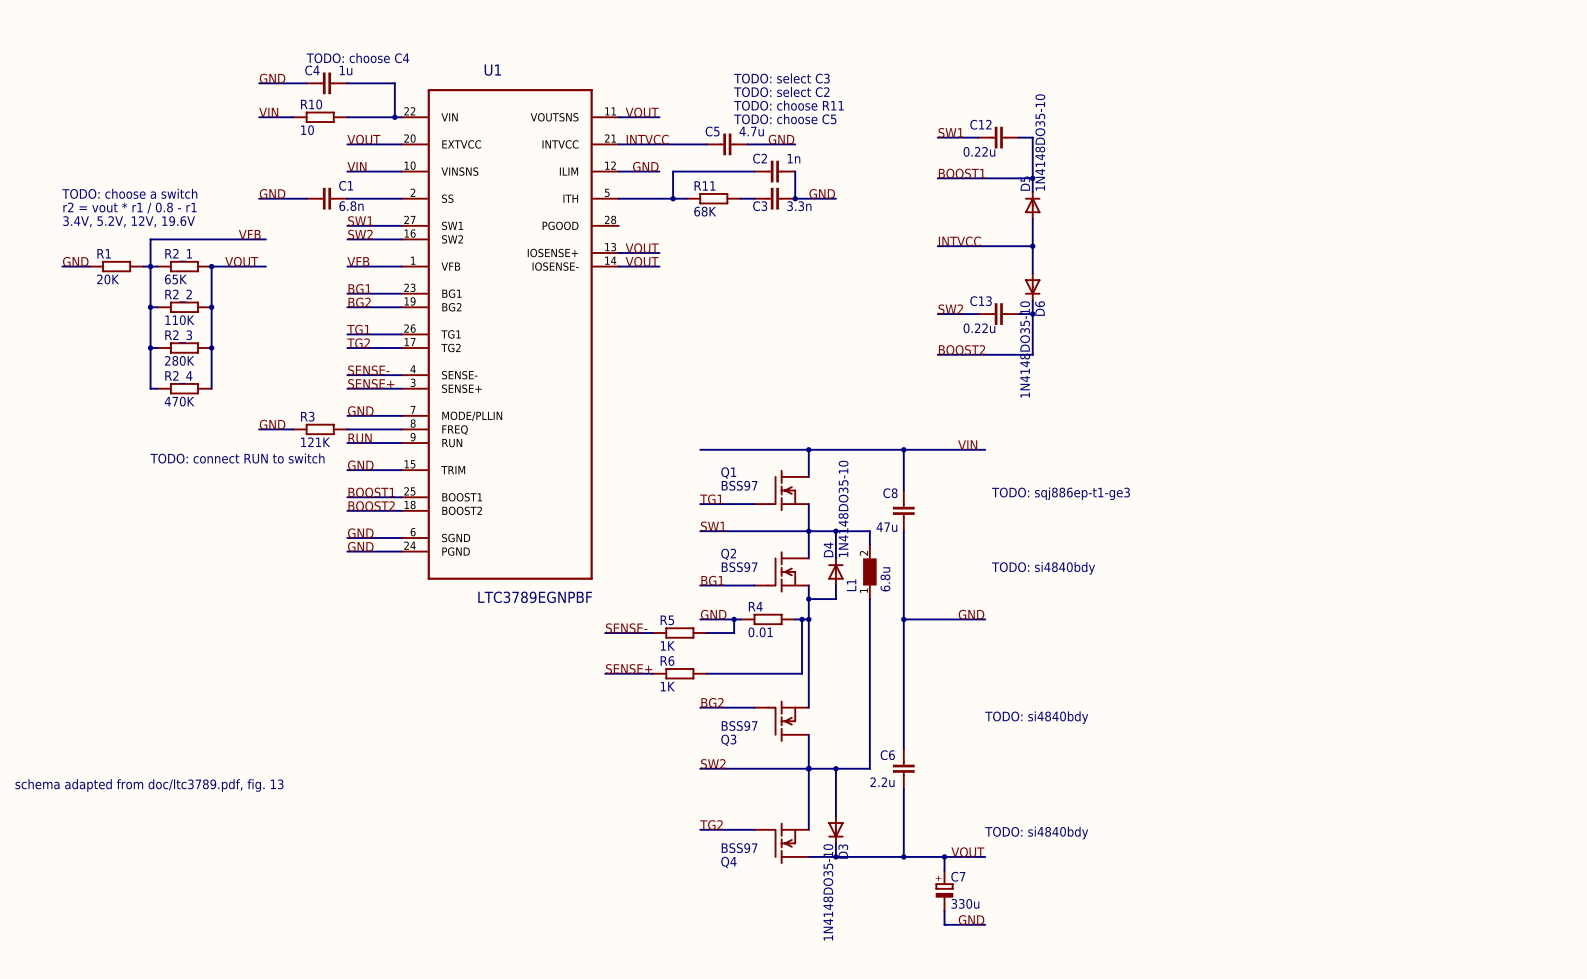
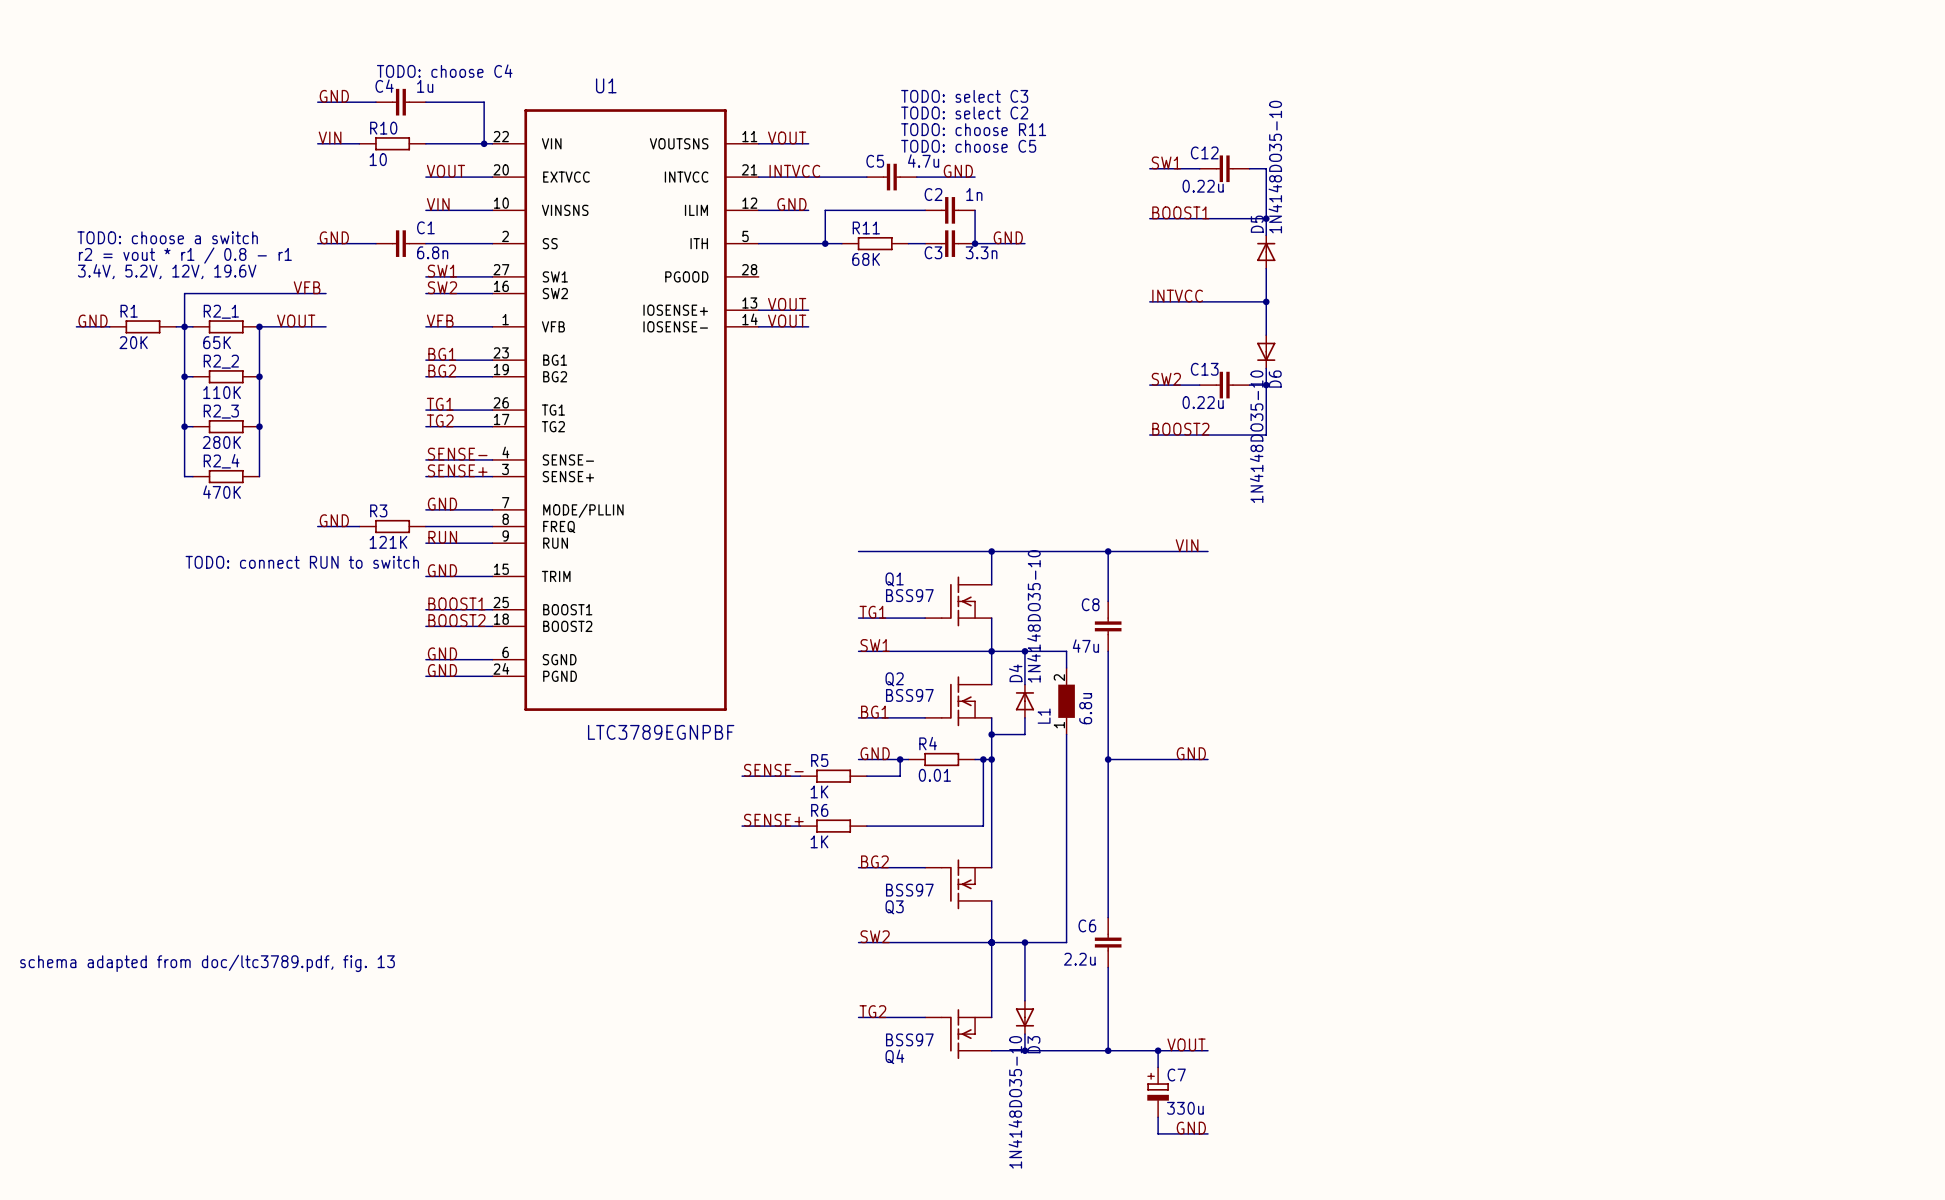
text: TODO: sqj886ep-t1-ge3 (1060, 493) -> none
text: TODO: si4840bdy (1043, 568) -> none
text: TODO: si4840bdy (1036, 717) -> none
text: TODO: si4840bdy (1036, 833) -> none

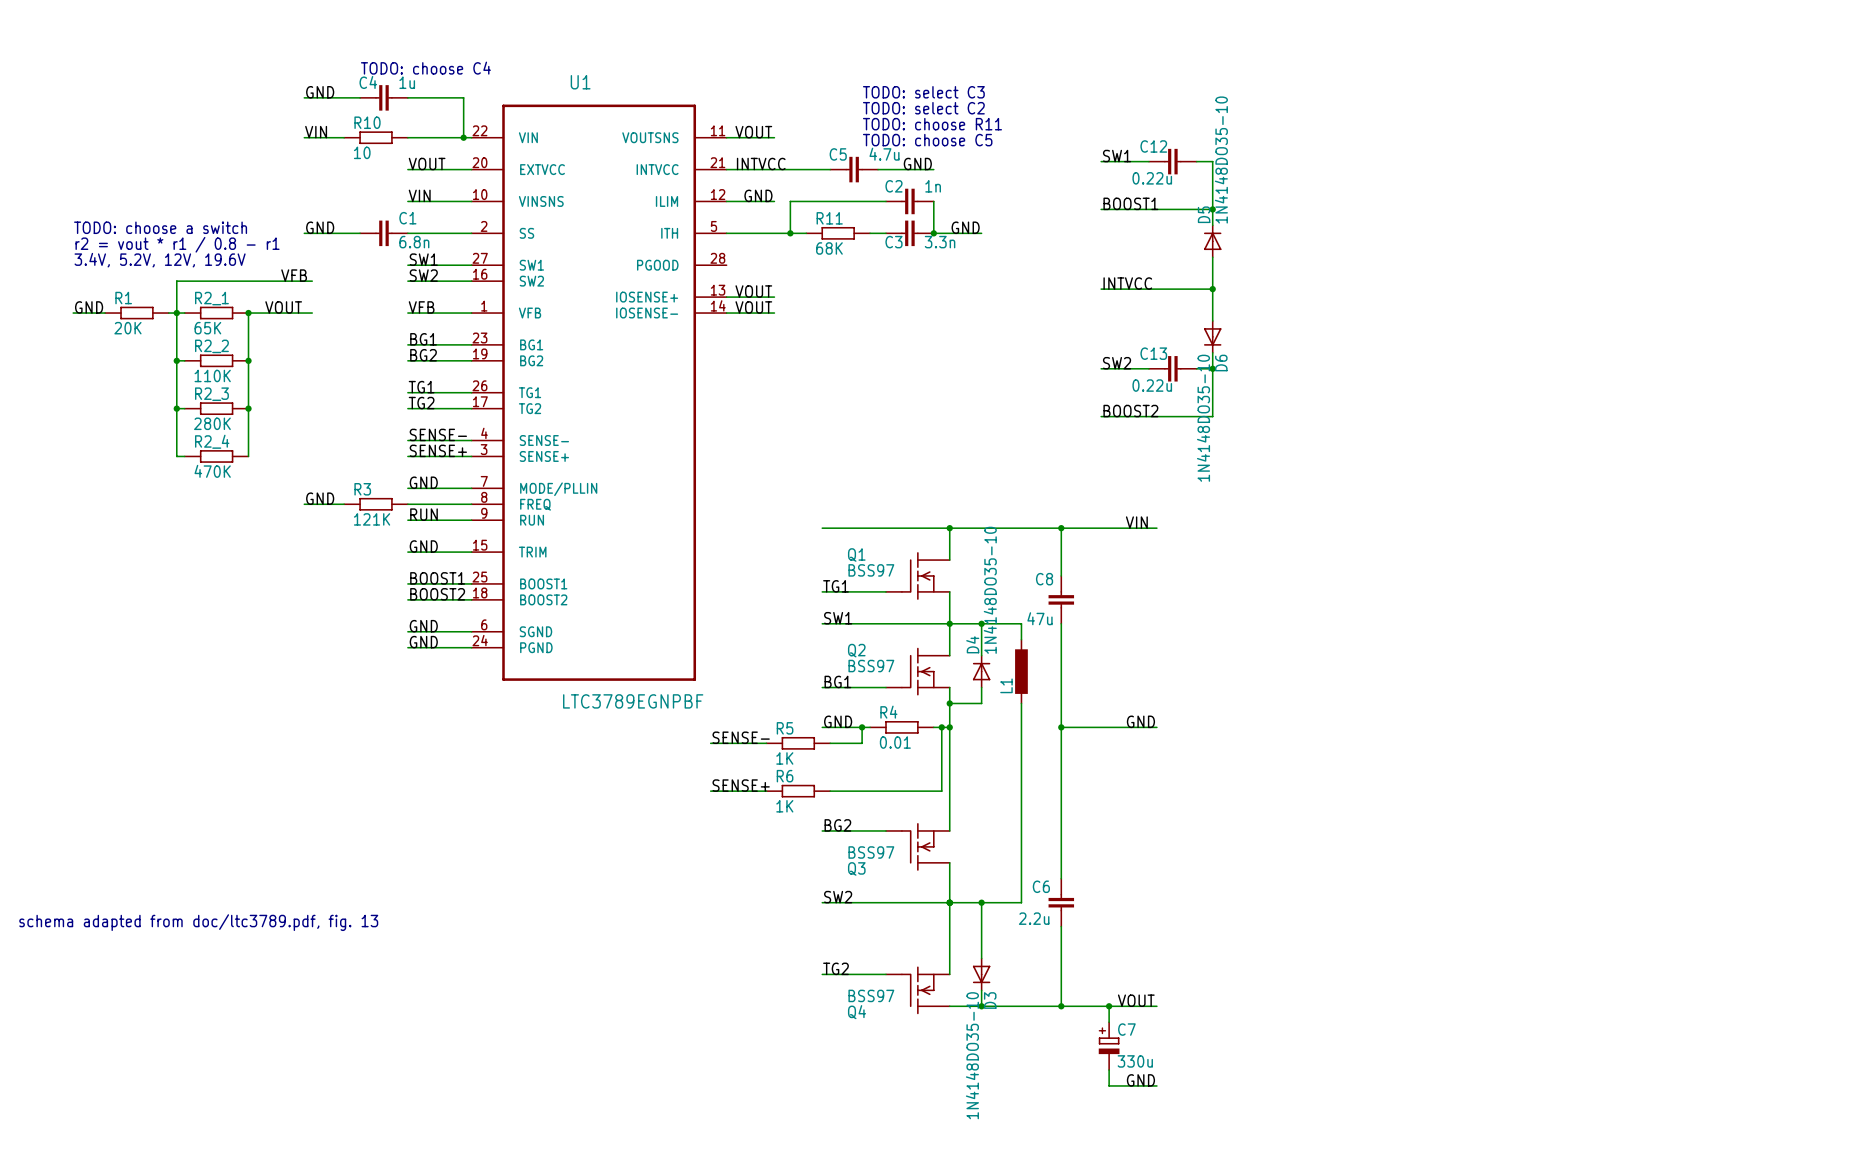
text: TODO: connect RUN to switch (302, 562) -> none
L1 symbol: [1058, 667, 1075, 735] -> [1015, 639, 1028, 704]
L1 value: 6.8u (1085, 708) -> none

